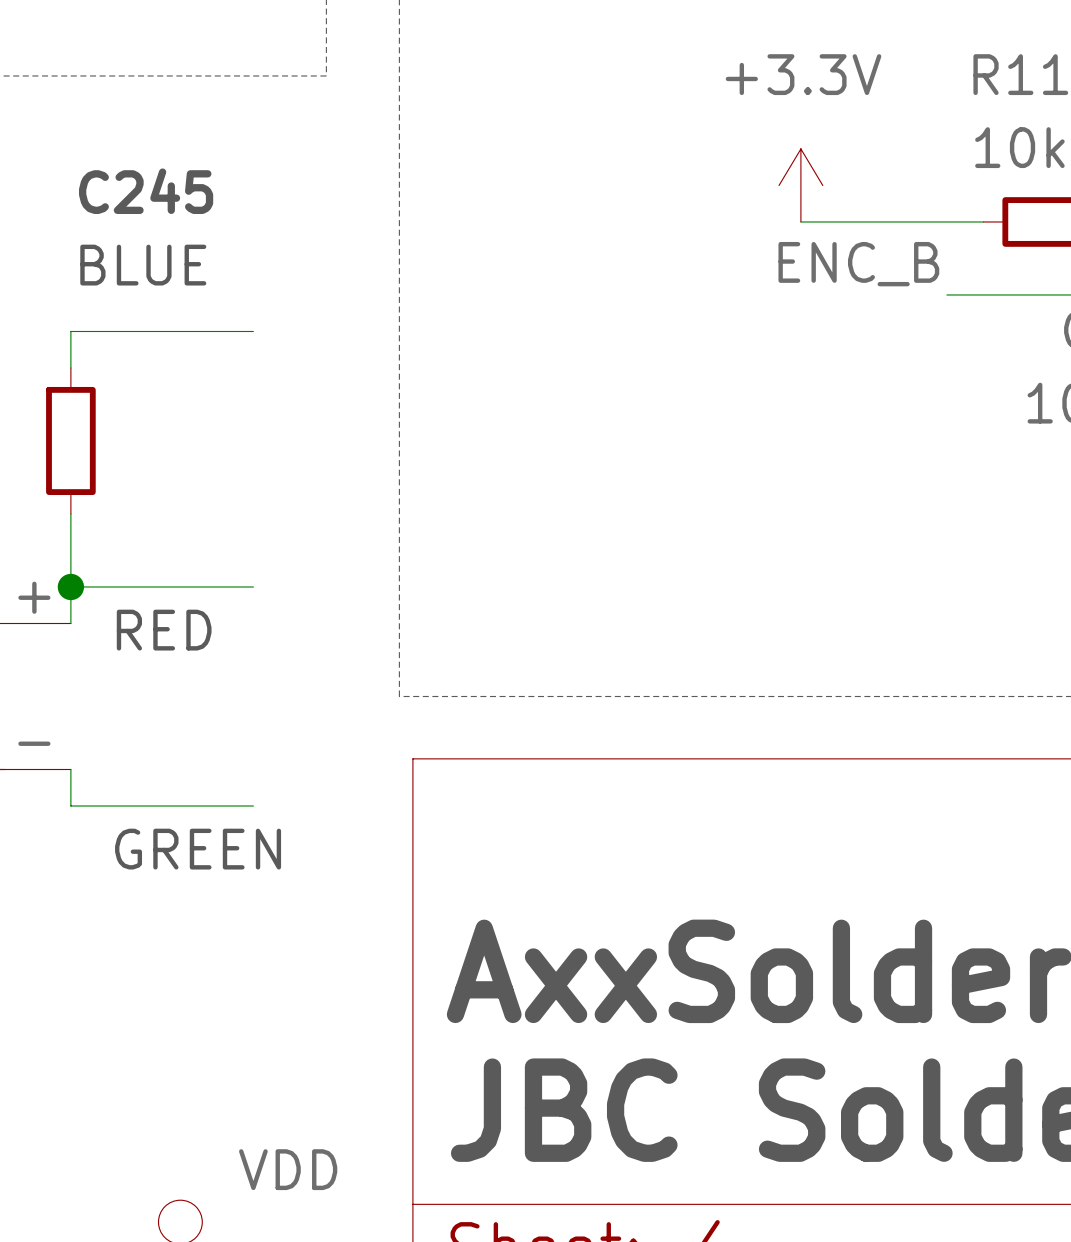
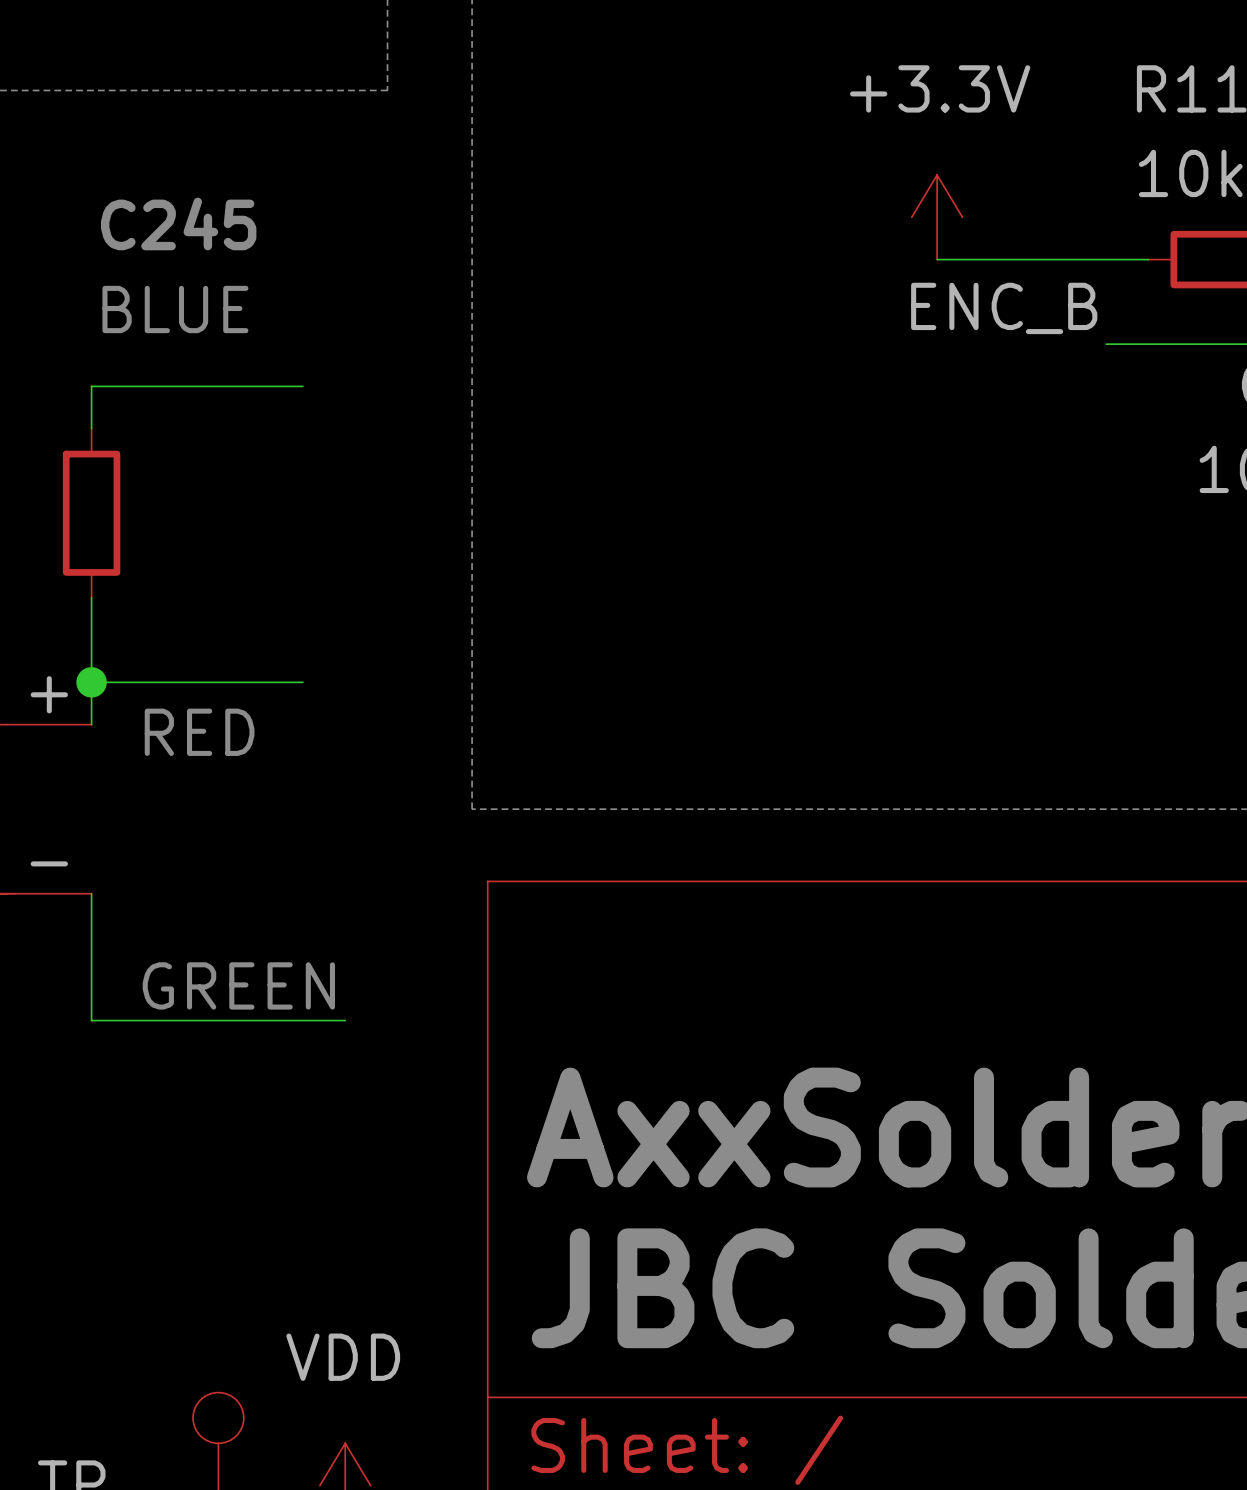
wire: (70, 806) (253, 806) -> (91, 936) (91, 1020) (345, 1020)

